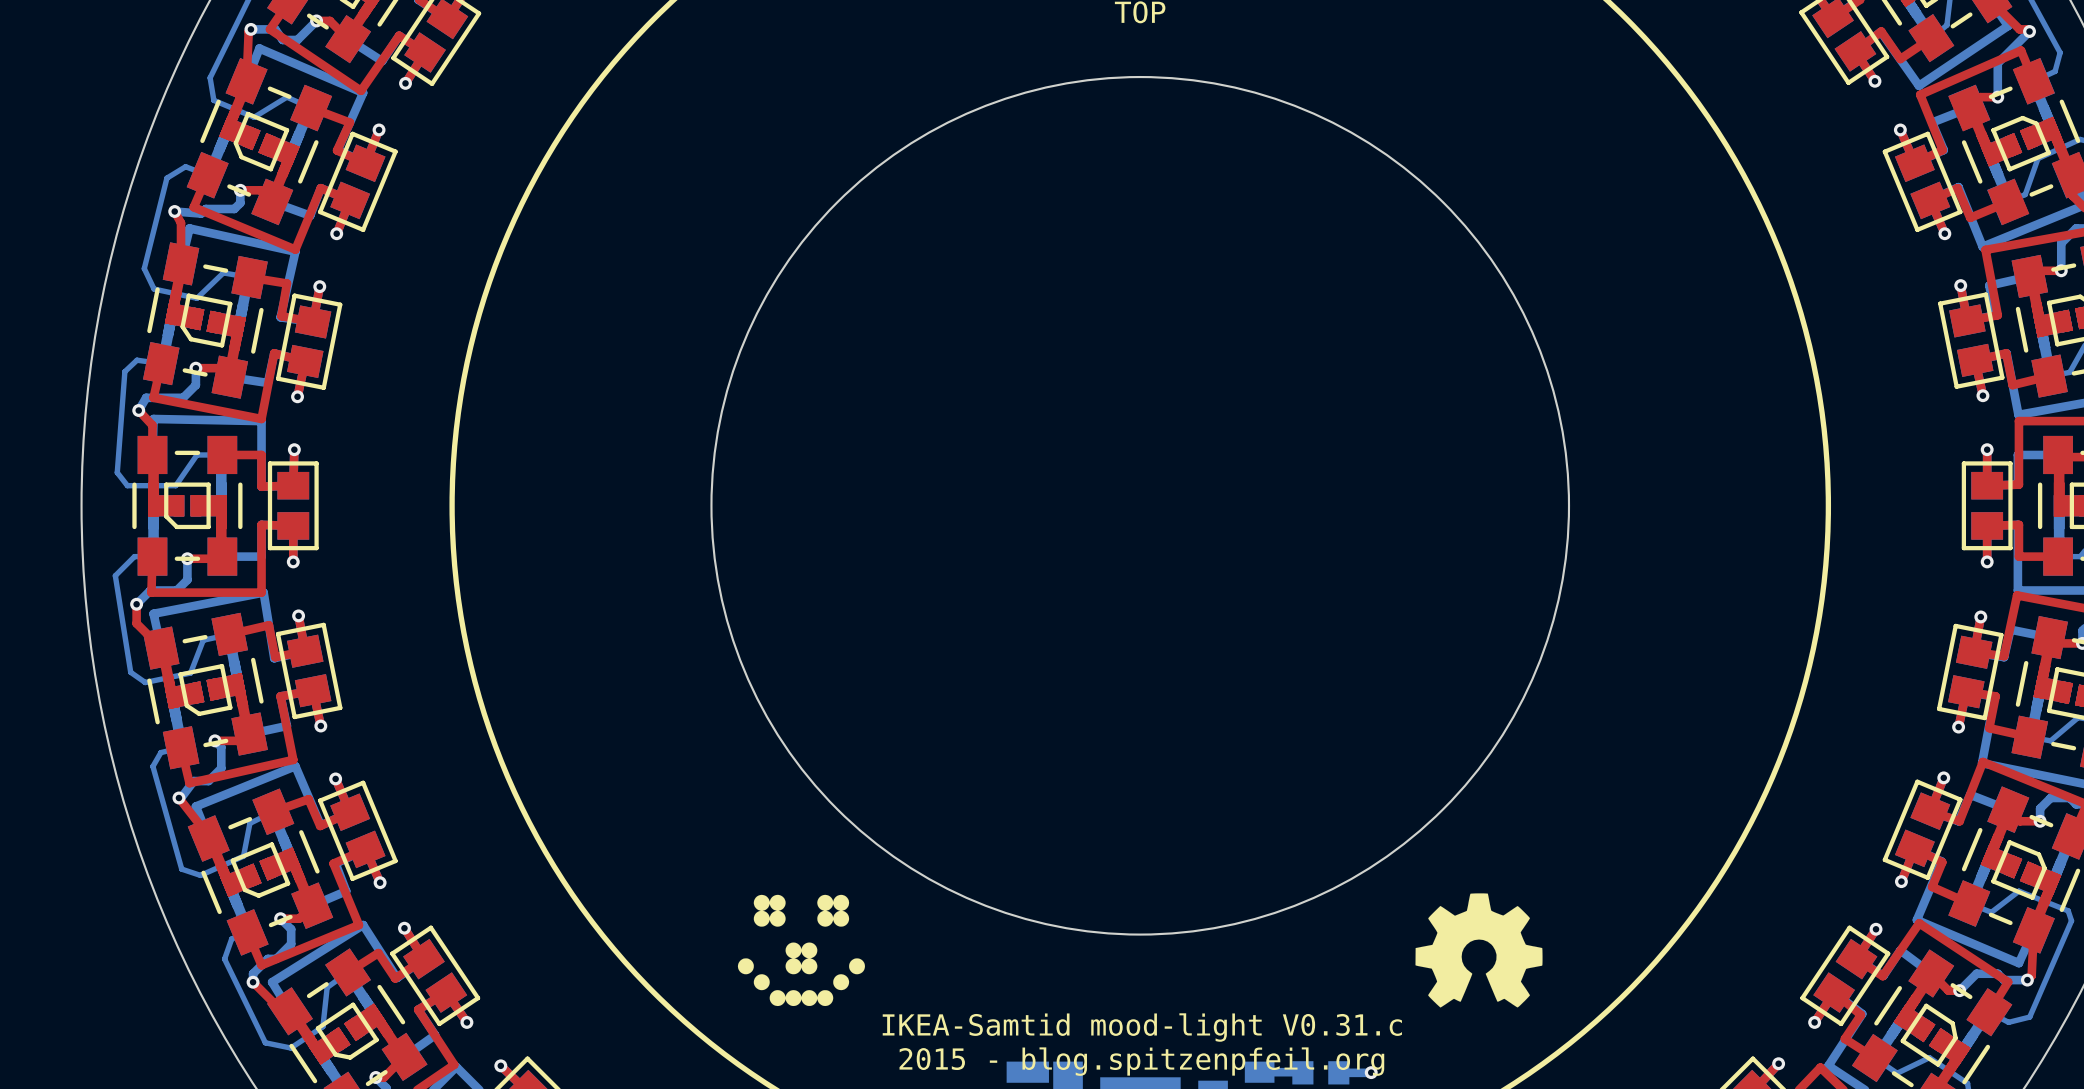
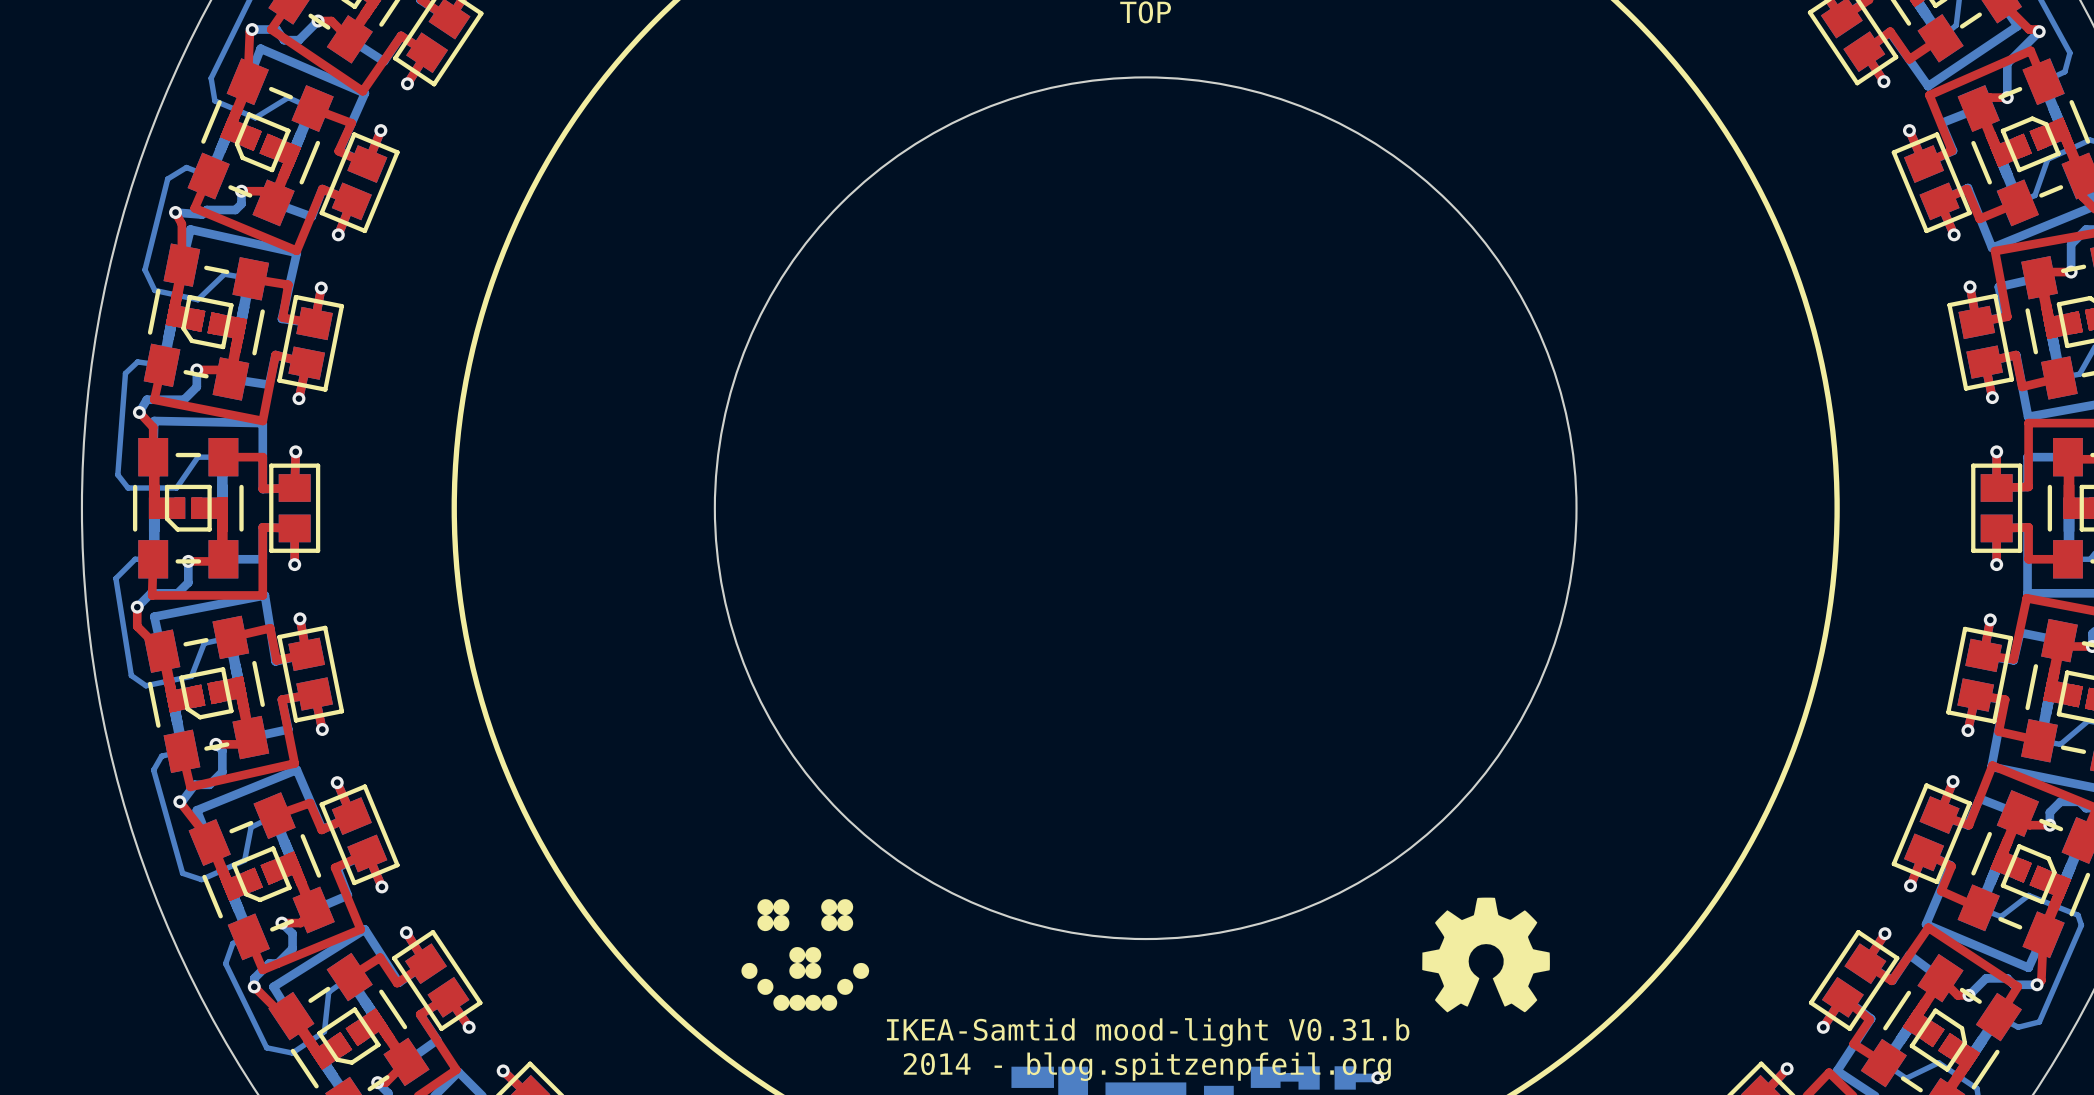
text: IKEA-Samtid mood-light V0.31.c (1142, 1027) -> IKEA-Samtid mood-light V0.31.b (1148, 1032)
text: 2015 - blog.spitzenpfeil.org (1141, 1061) -> 2014 - blog.spitzenpfeil.org (1147, 1066)

